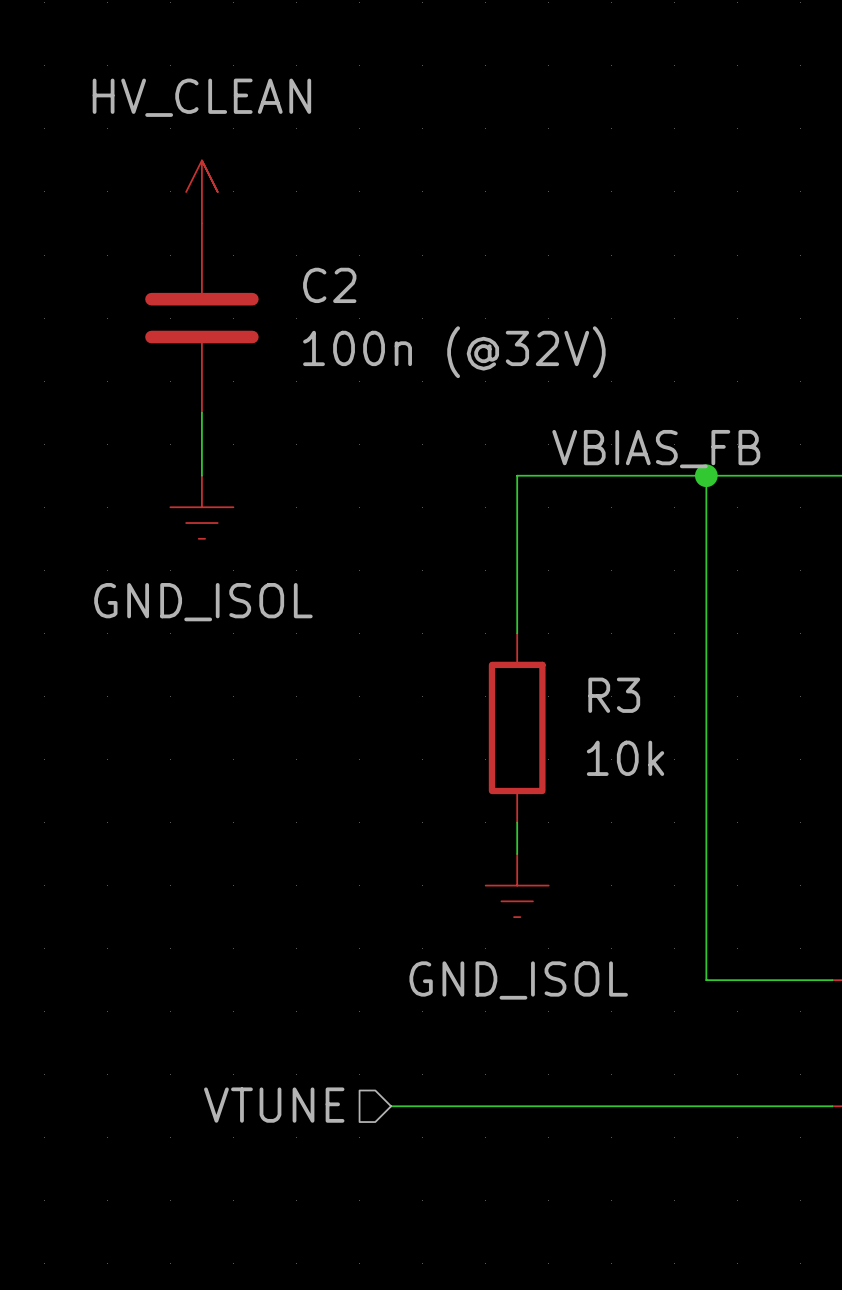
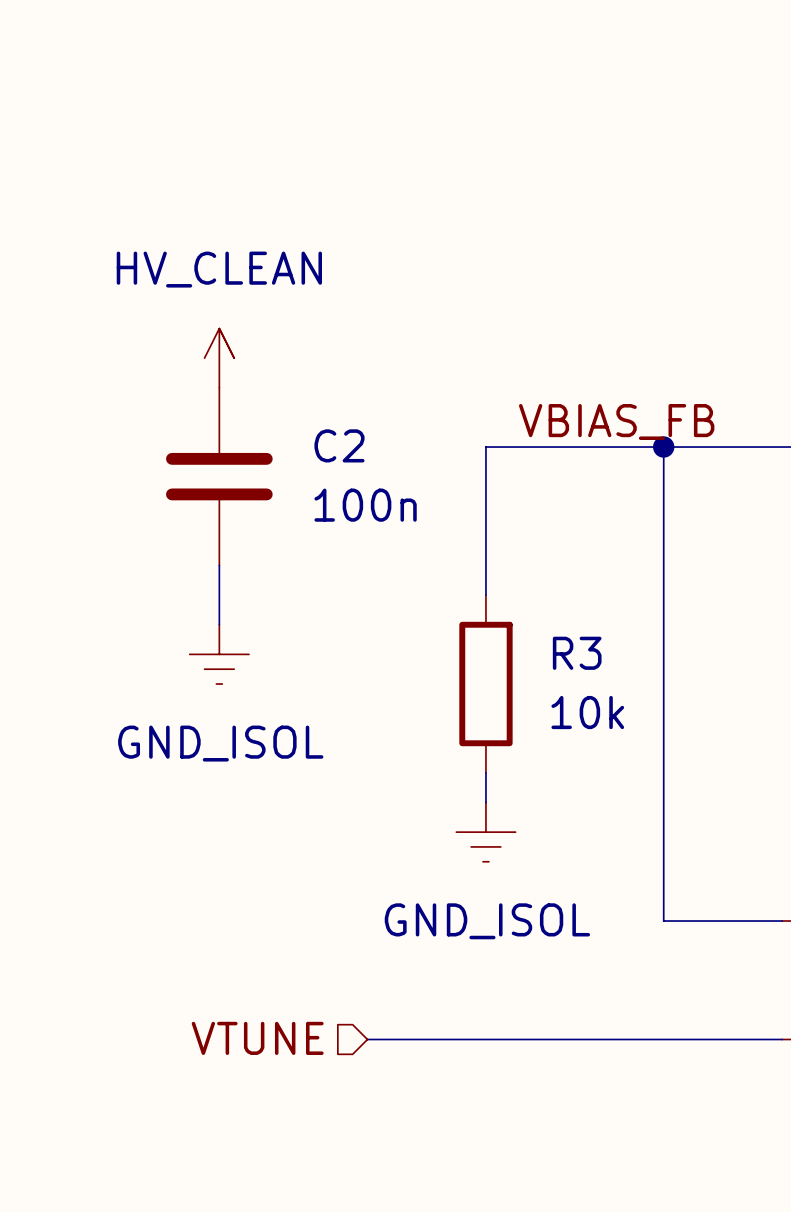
power symbol position: HV_CLEAN (201, 191) -> HV_CLEAN (219, 358)
C2 position: (201, 318) -> (219, 476)
C2 value: 100n (@32V) (454, 352) -> 100n (365, 505)
wire: (201, 412) (201, 475) -> (219, 565) (219, 624)
power symbol position: GND_ISOL (201, 507) -> GND_ISOL (219, 654)

